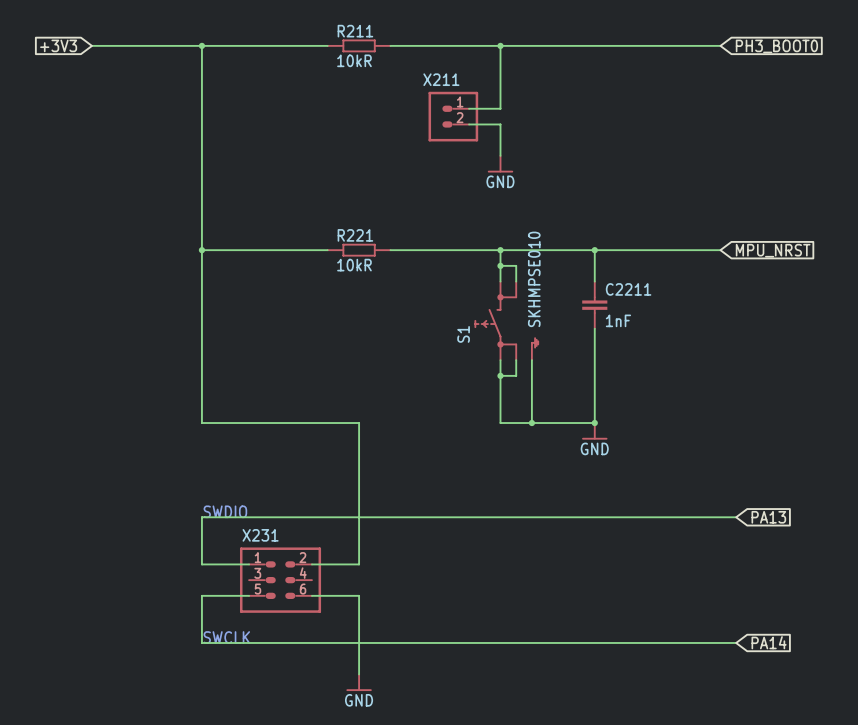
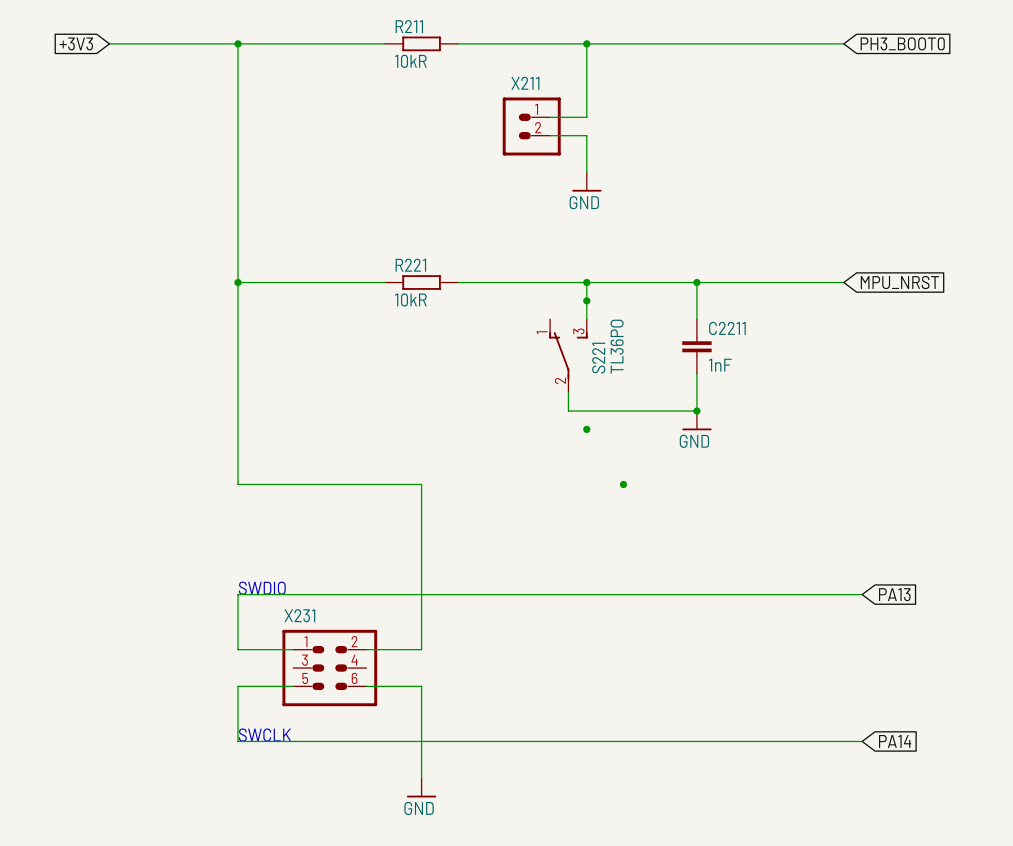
wire: (500, 265) (516, 265) (516, 281) -> none
S221: none -> TL36PO (568, 355)
S1: SKHMPSE010 (506, 320) -> none
wire: (500, 360) (500, 423) (594, 423) (594, 360) -> (568, 392) (568, 411) (696, 411)
wire: (516, 360) (516, 375) (500, 375) -> none
wire: (531, 360) (531, 423) -> none
junction: none -> (696, 411)
junction: (594, 423) -> none
power symbol position: GND (594, 431) -> GND (696, 420)

